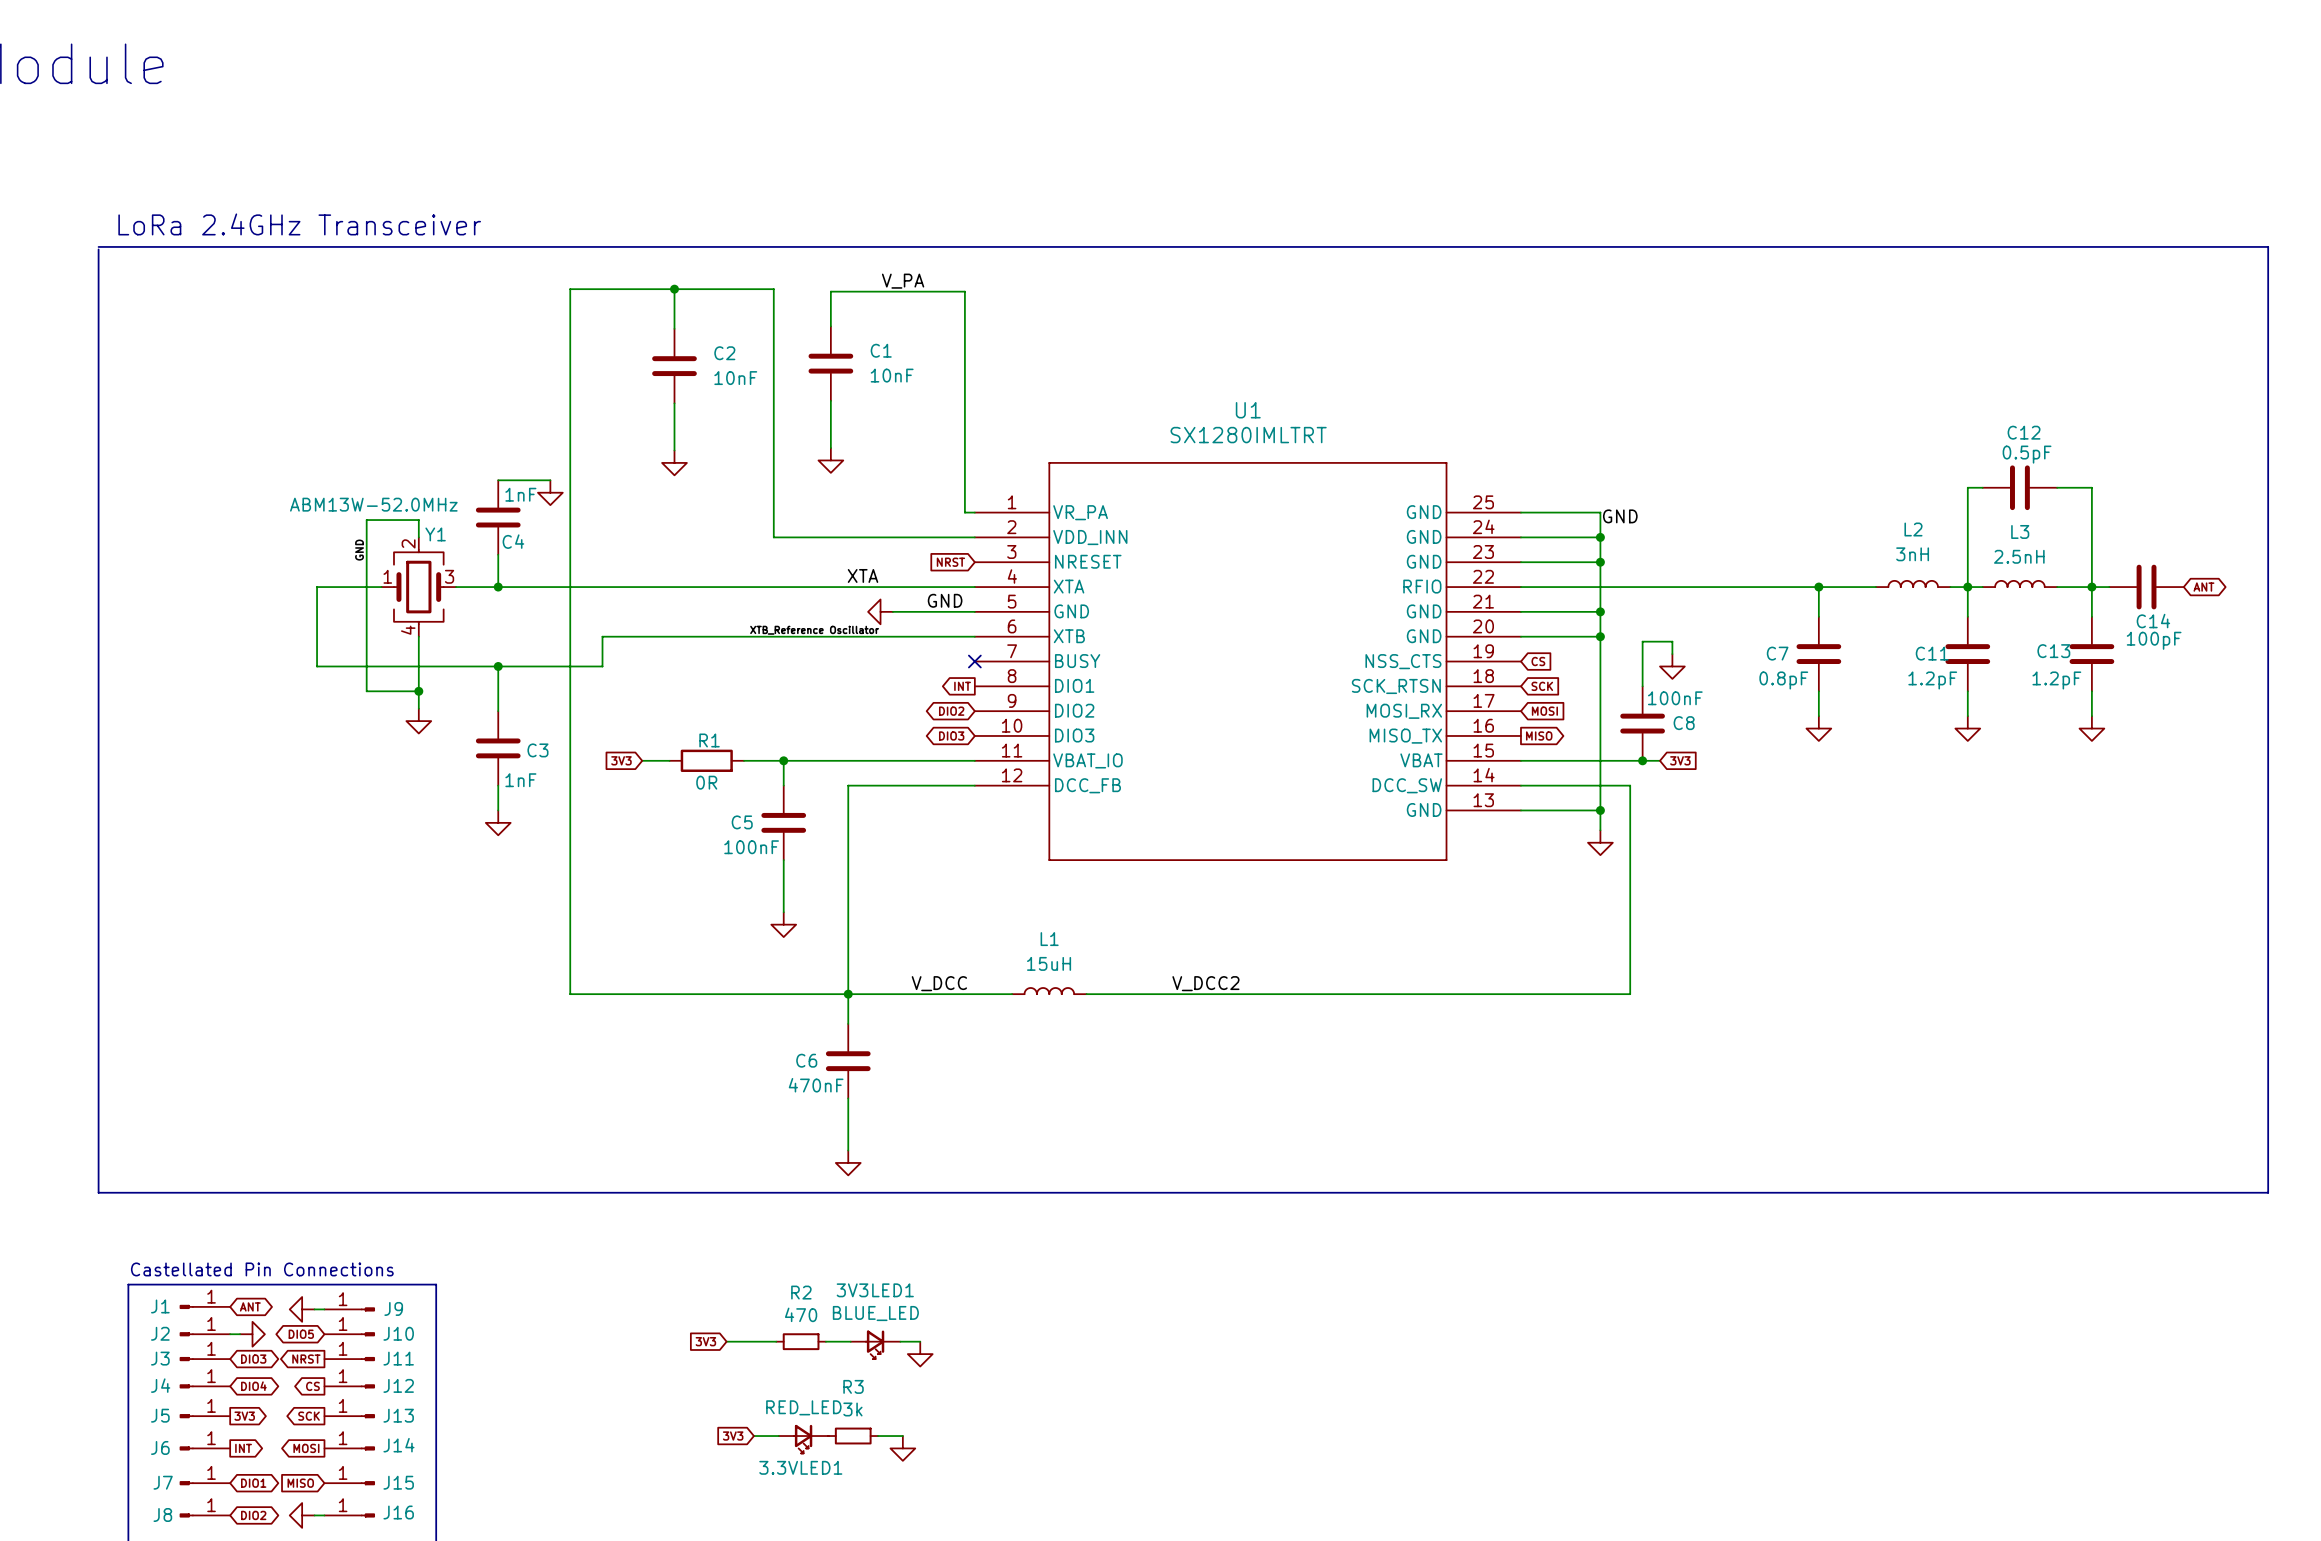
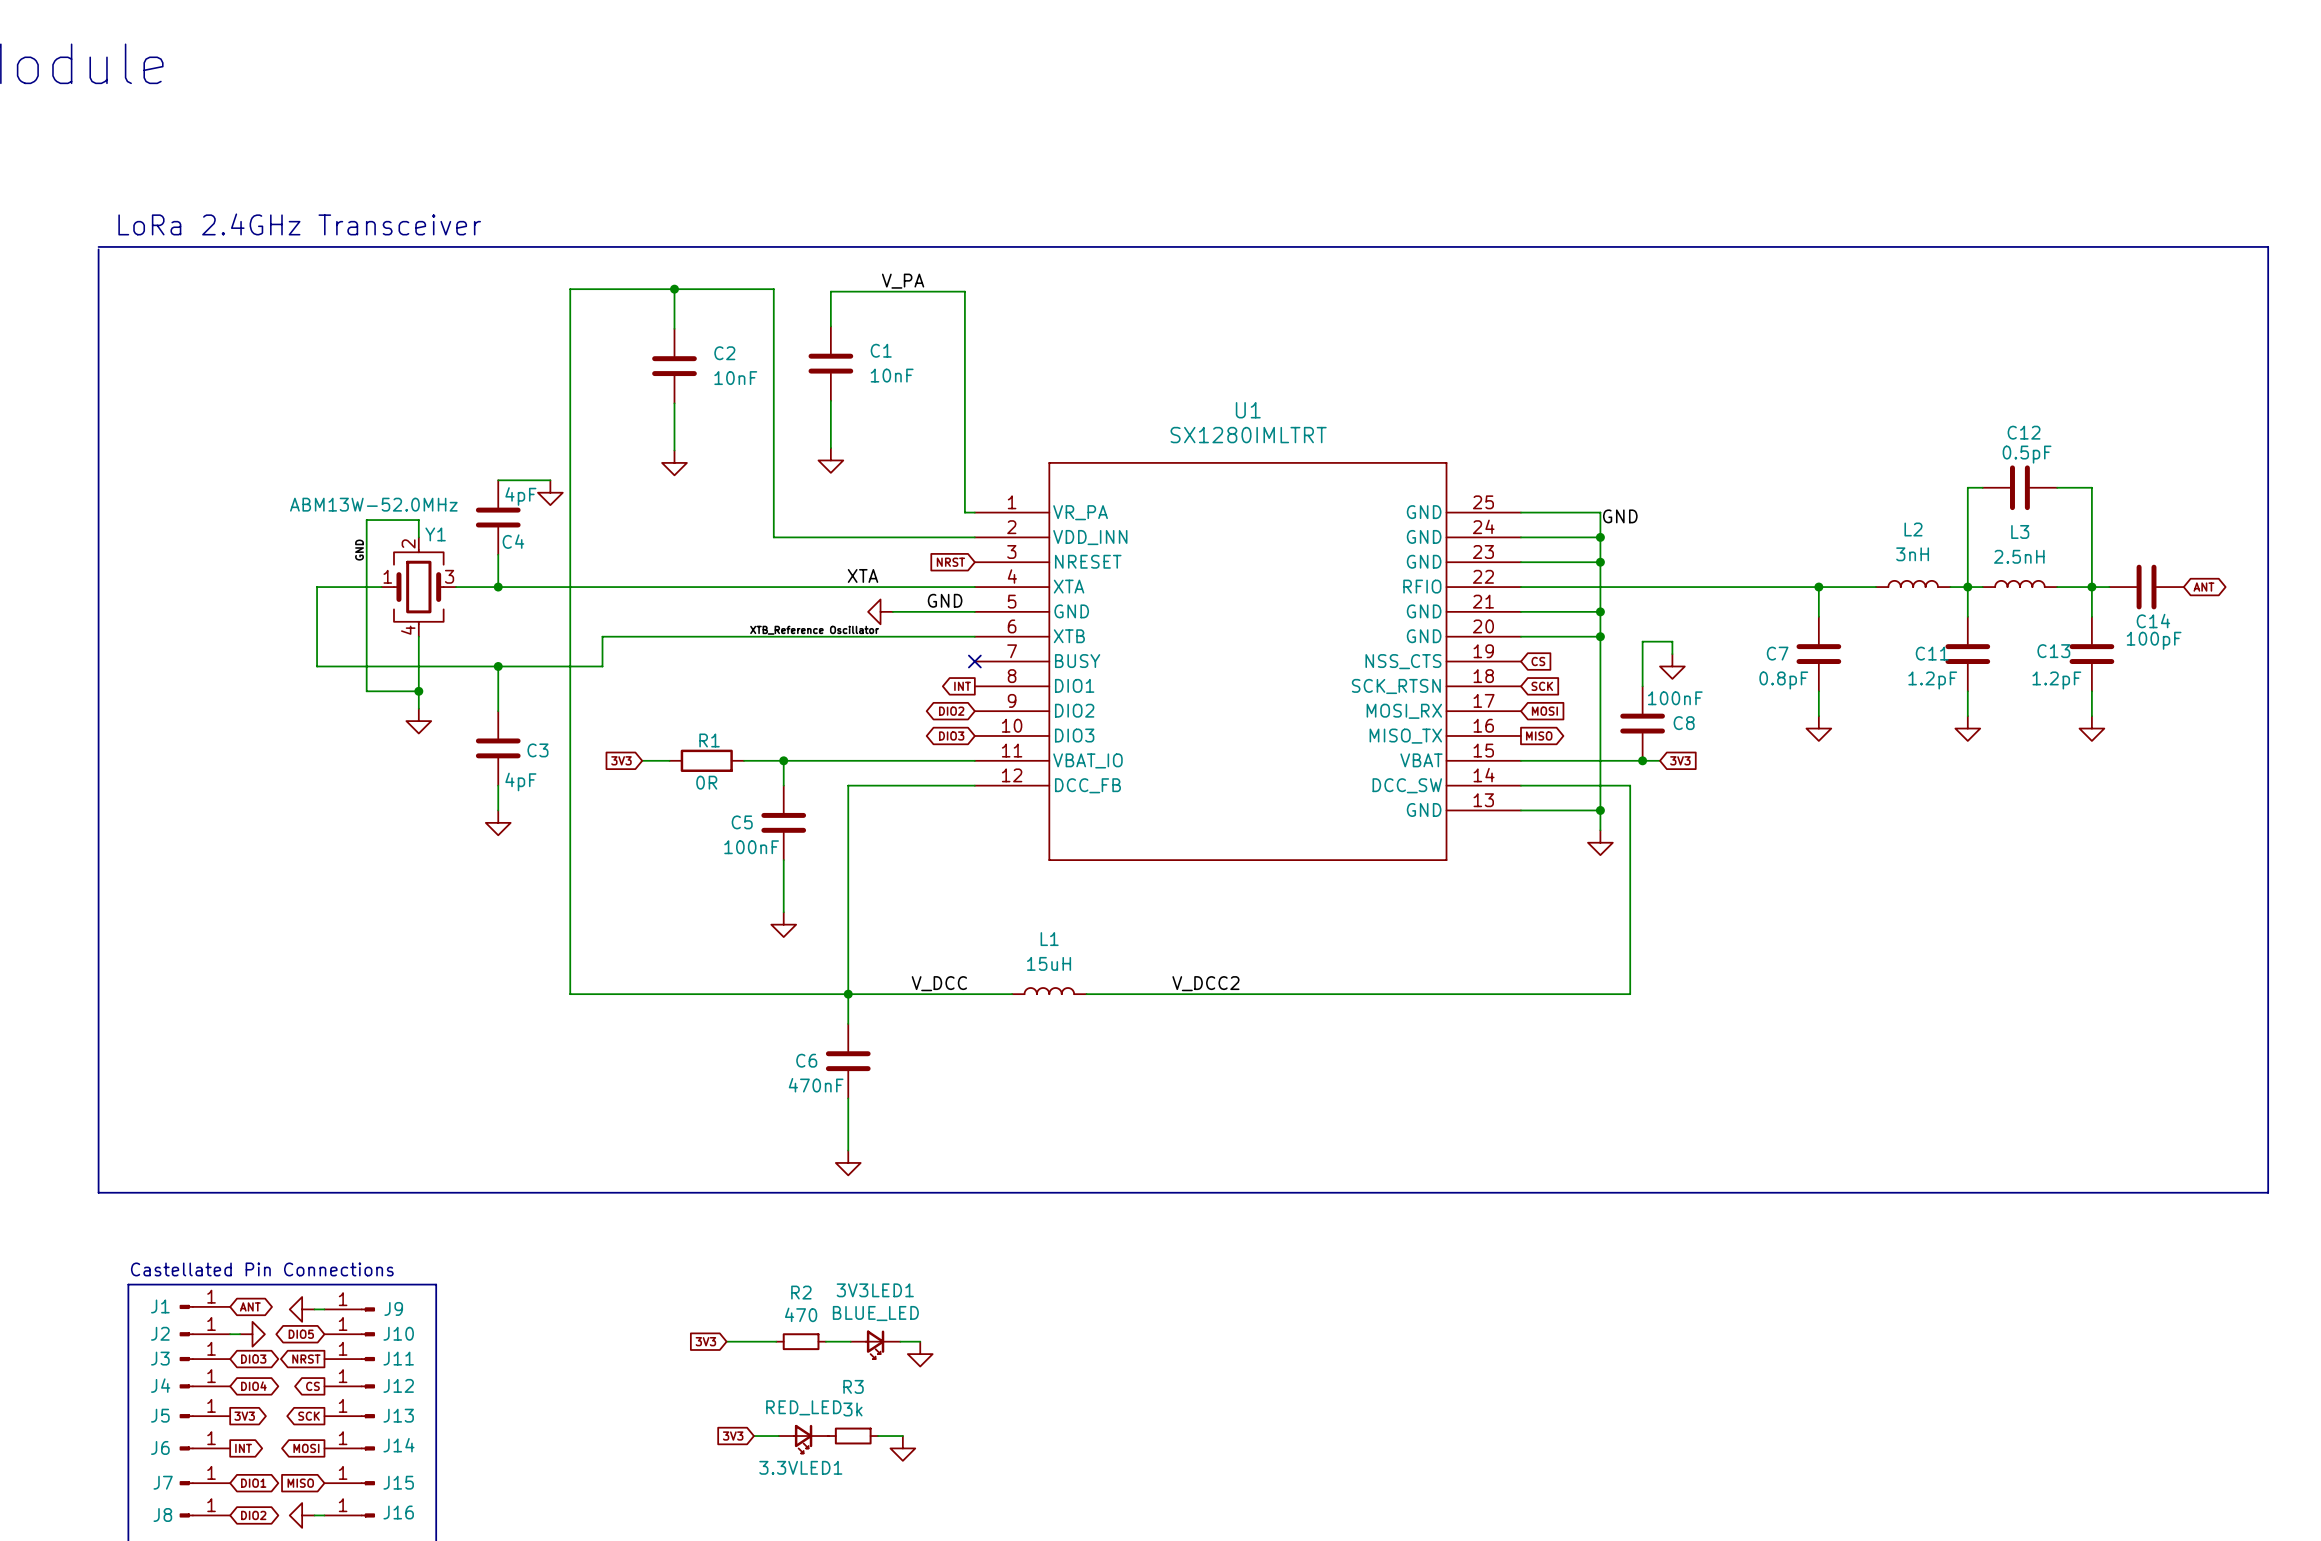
C4 value: 1nF (520, 494) -> 4pF (520, 496)
C3 value: 1nF (520, 780) -> 4pF (520, 781)

